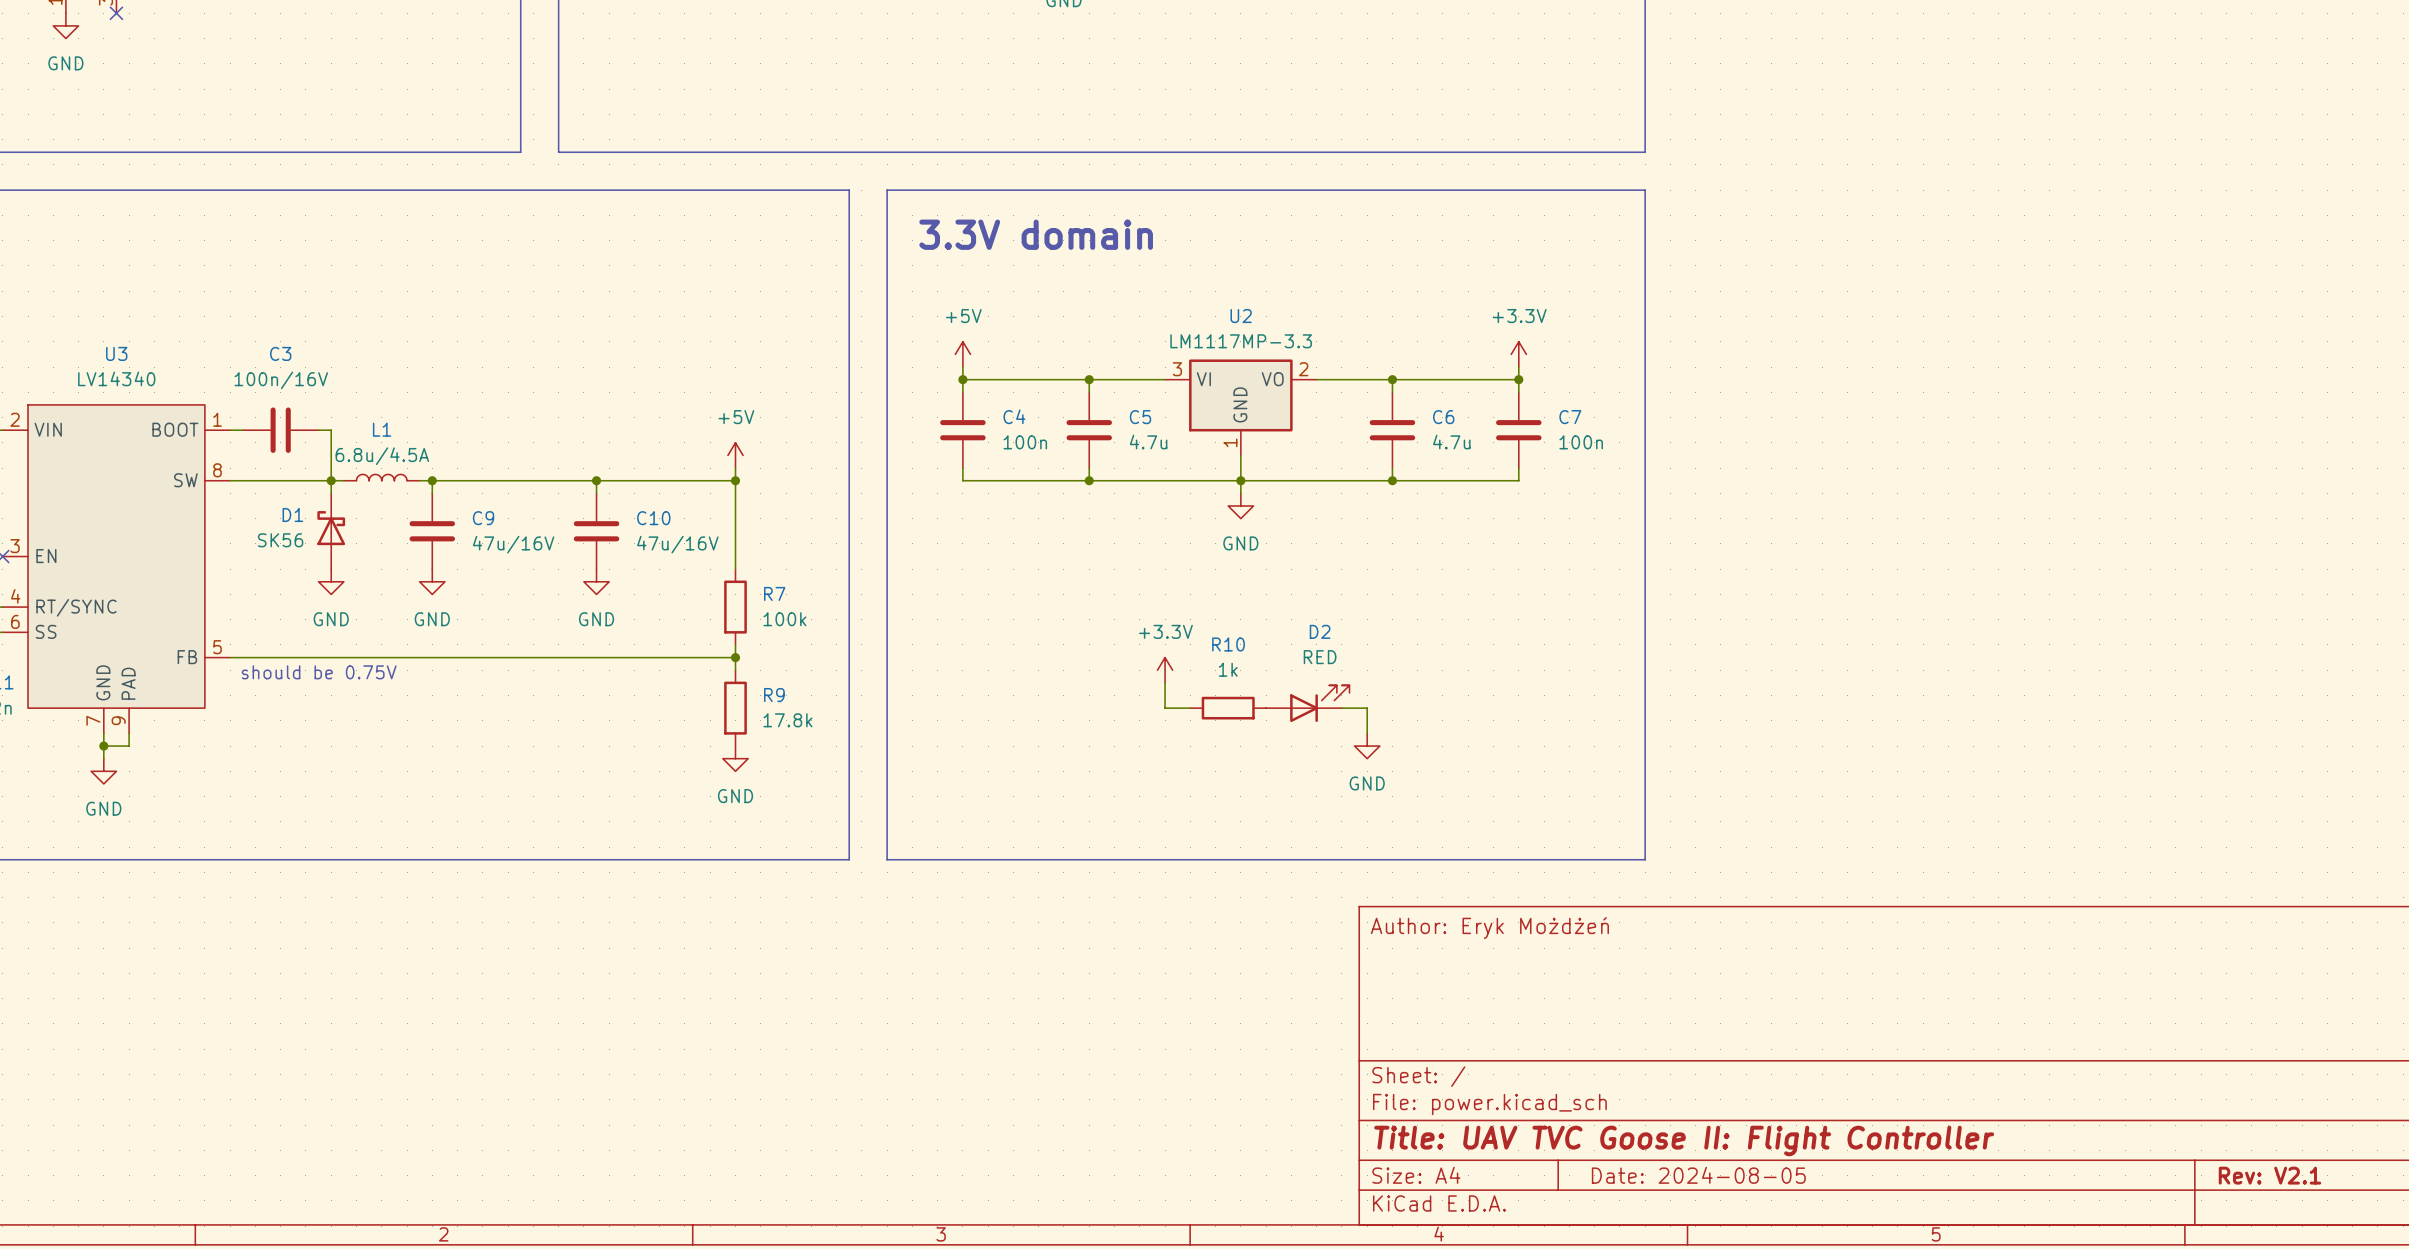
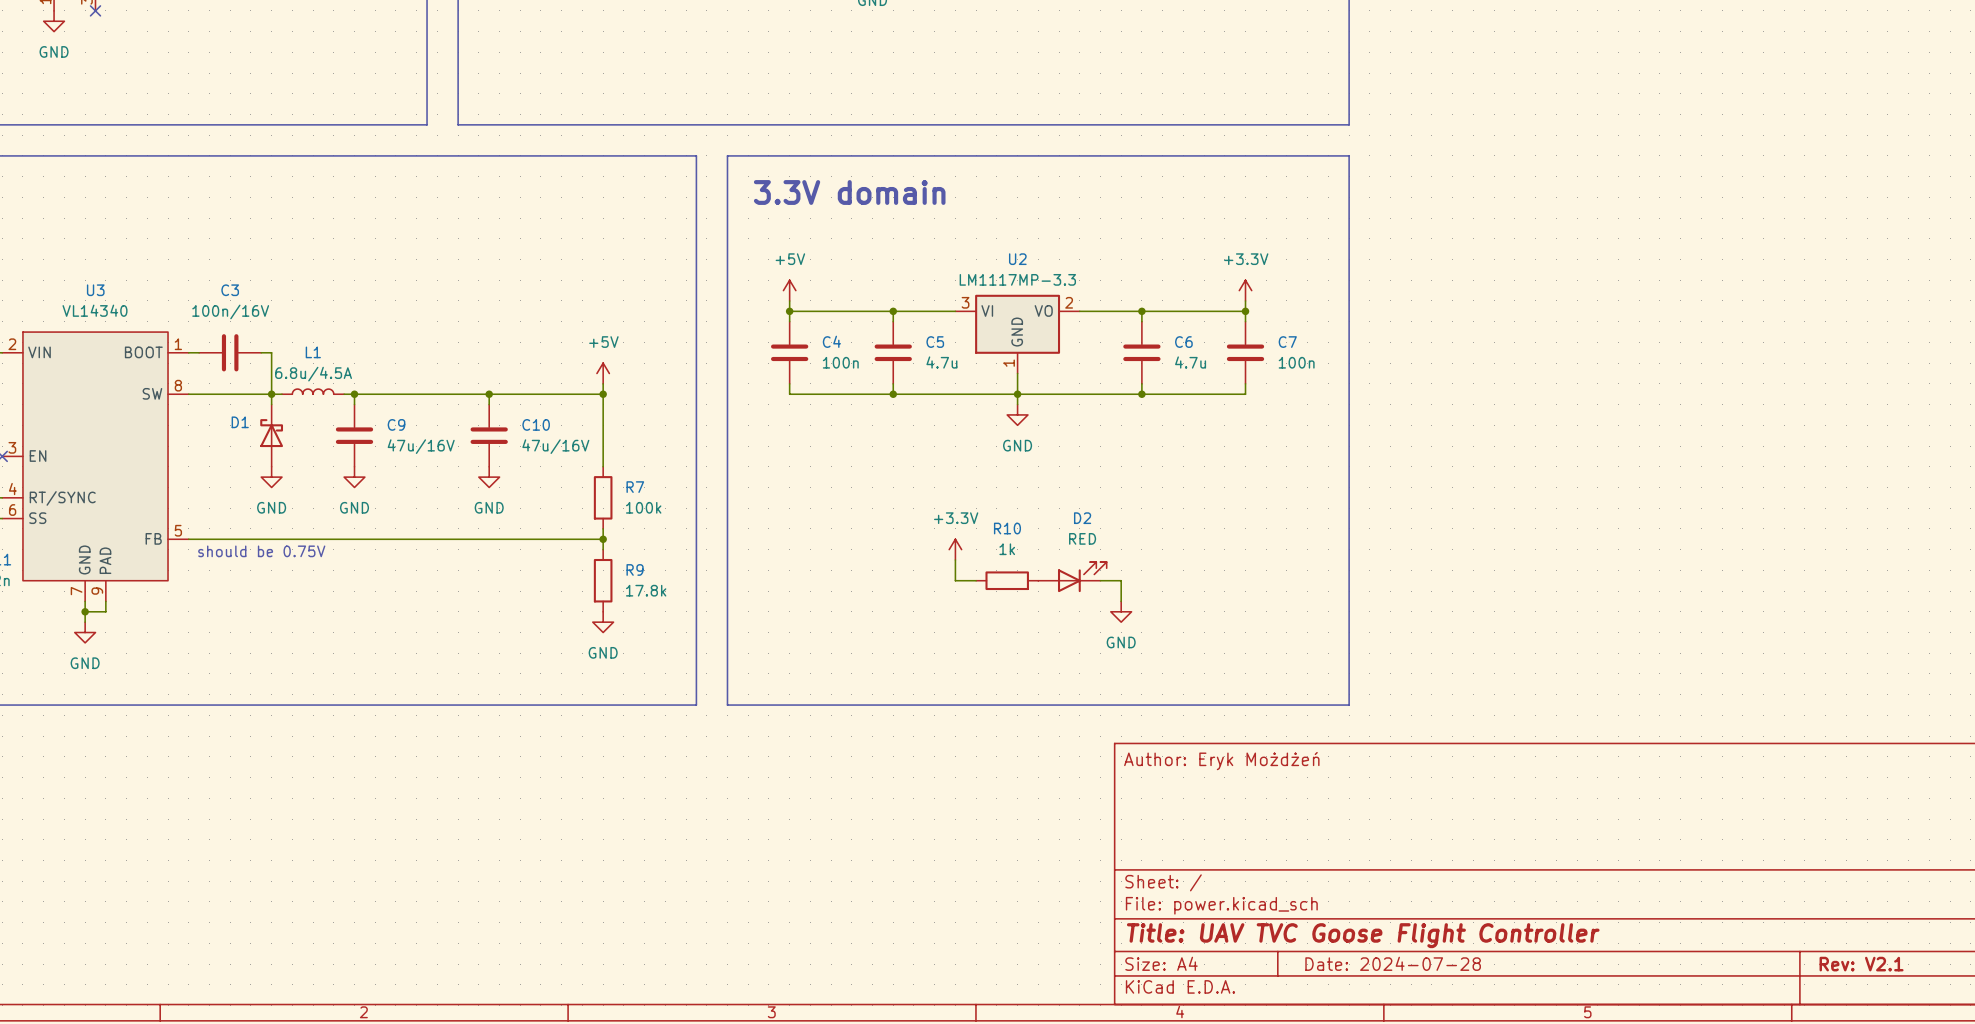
U3 value: LV14340 (116, 378) -> VL14340 (95, 310)
D1 value: SK56 (280, 540) -> none
title block: Title: UAV TVC Goose II: Flight Controller (1684, 1140) -> Title: UAV TVC Goose Flight Controller (1363, 935)
title block: Date: 2024-08-05 (1698, 1175) -> Date: 2024-07-28 (1393, 963)

